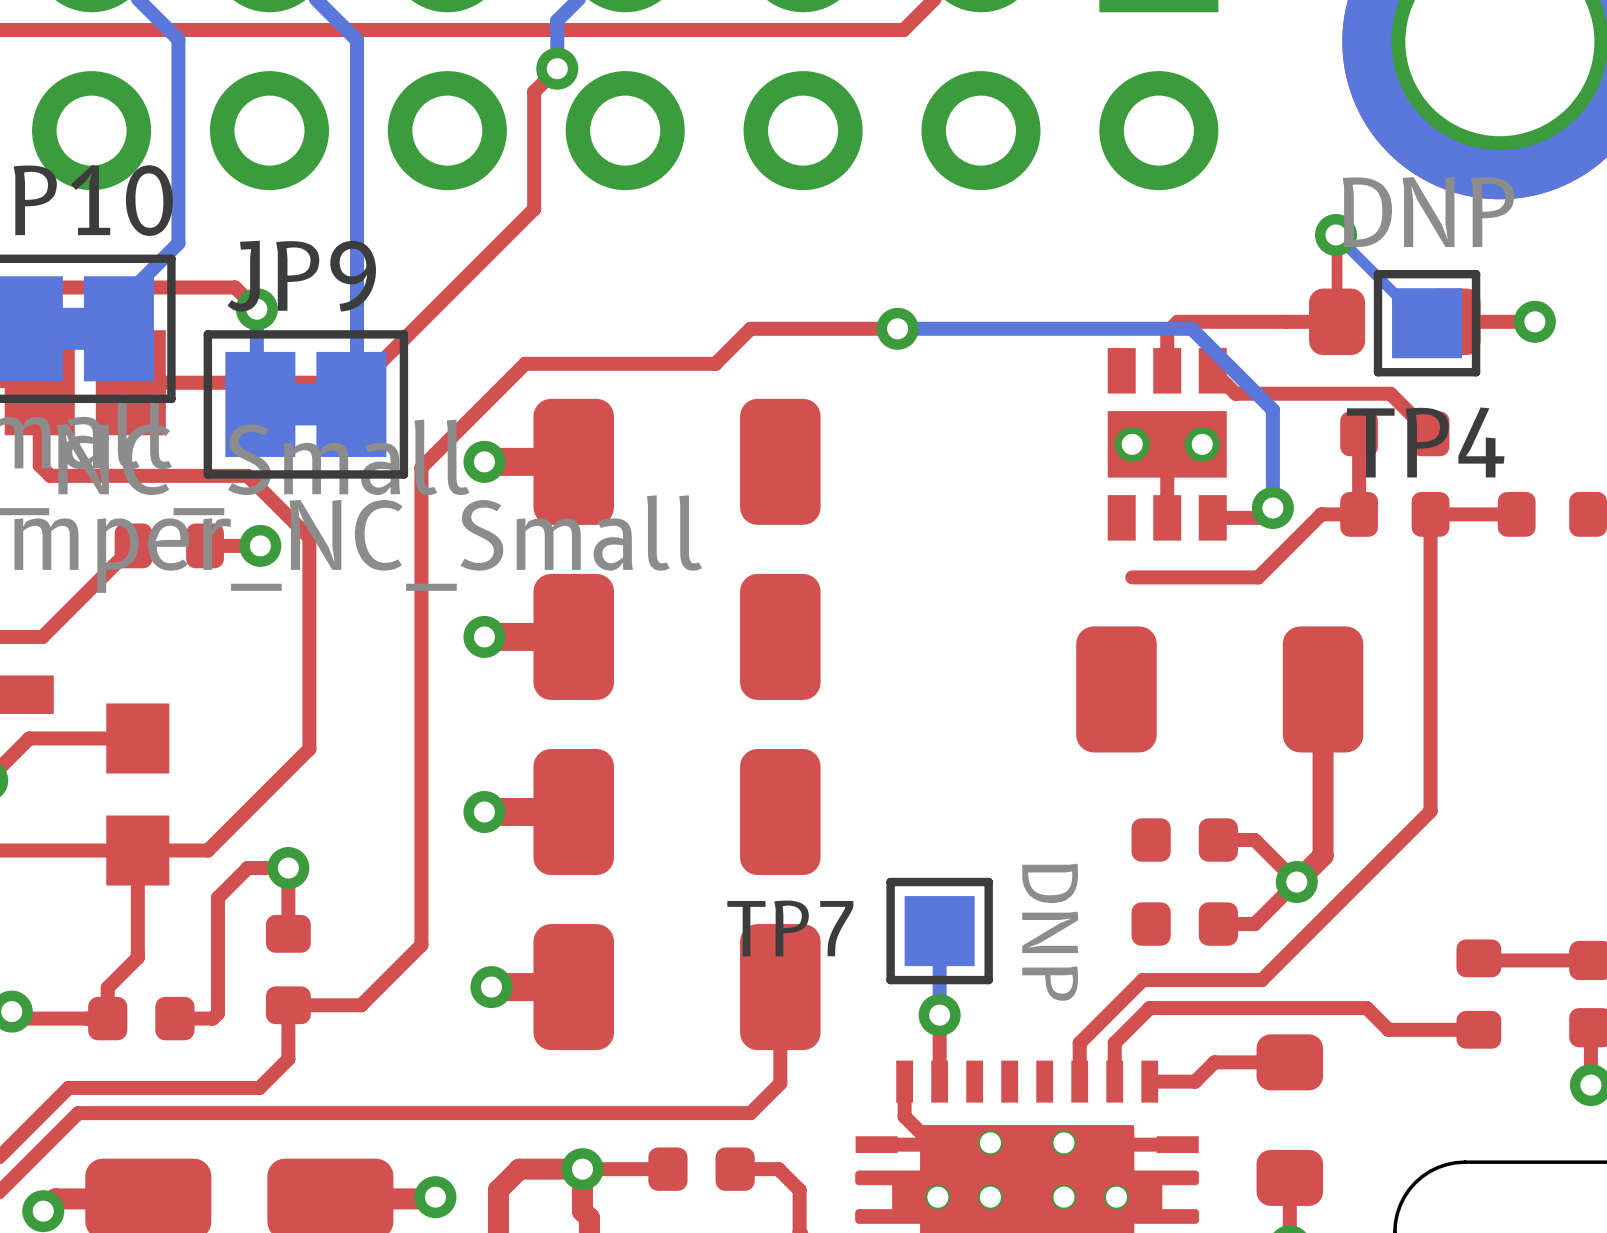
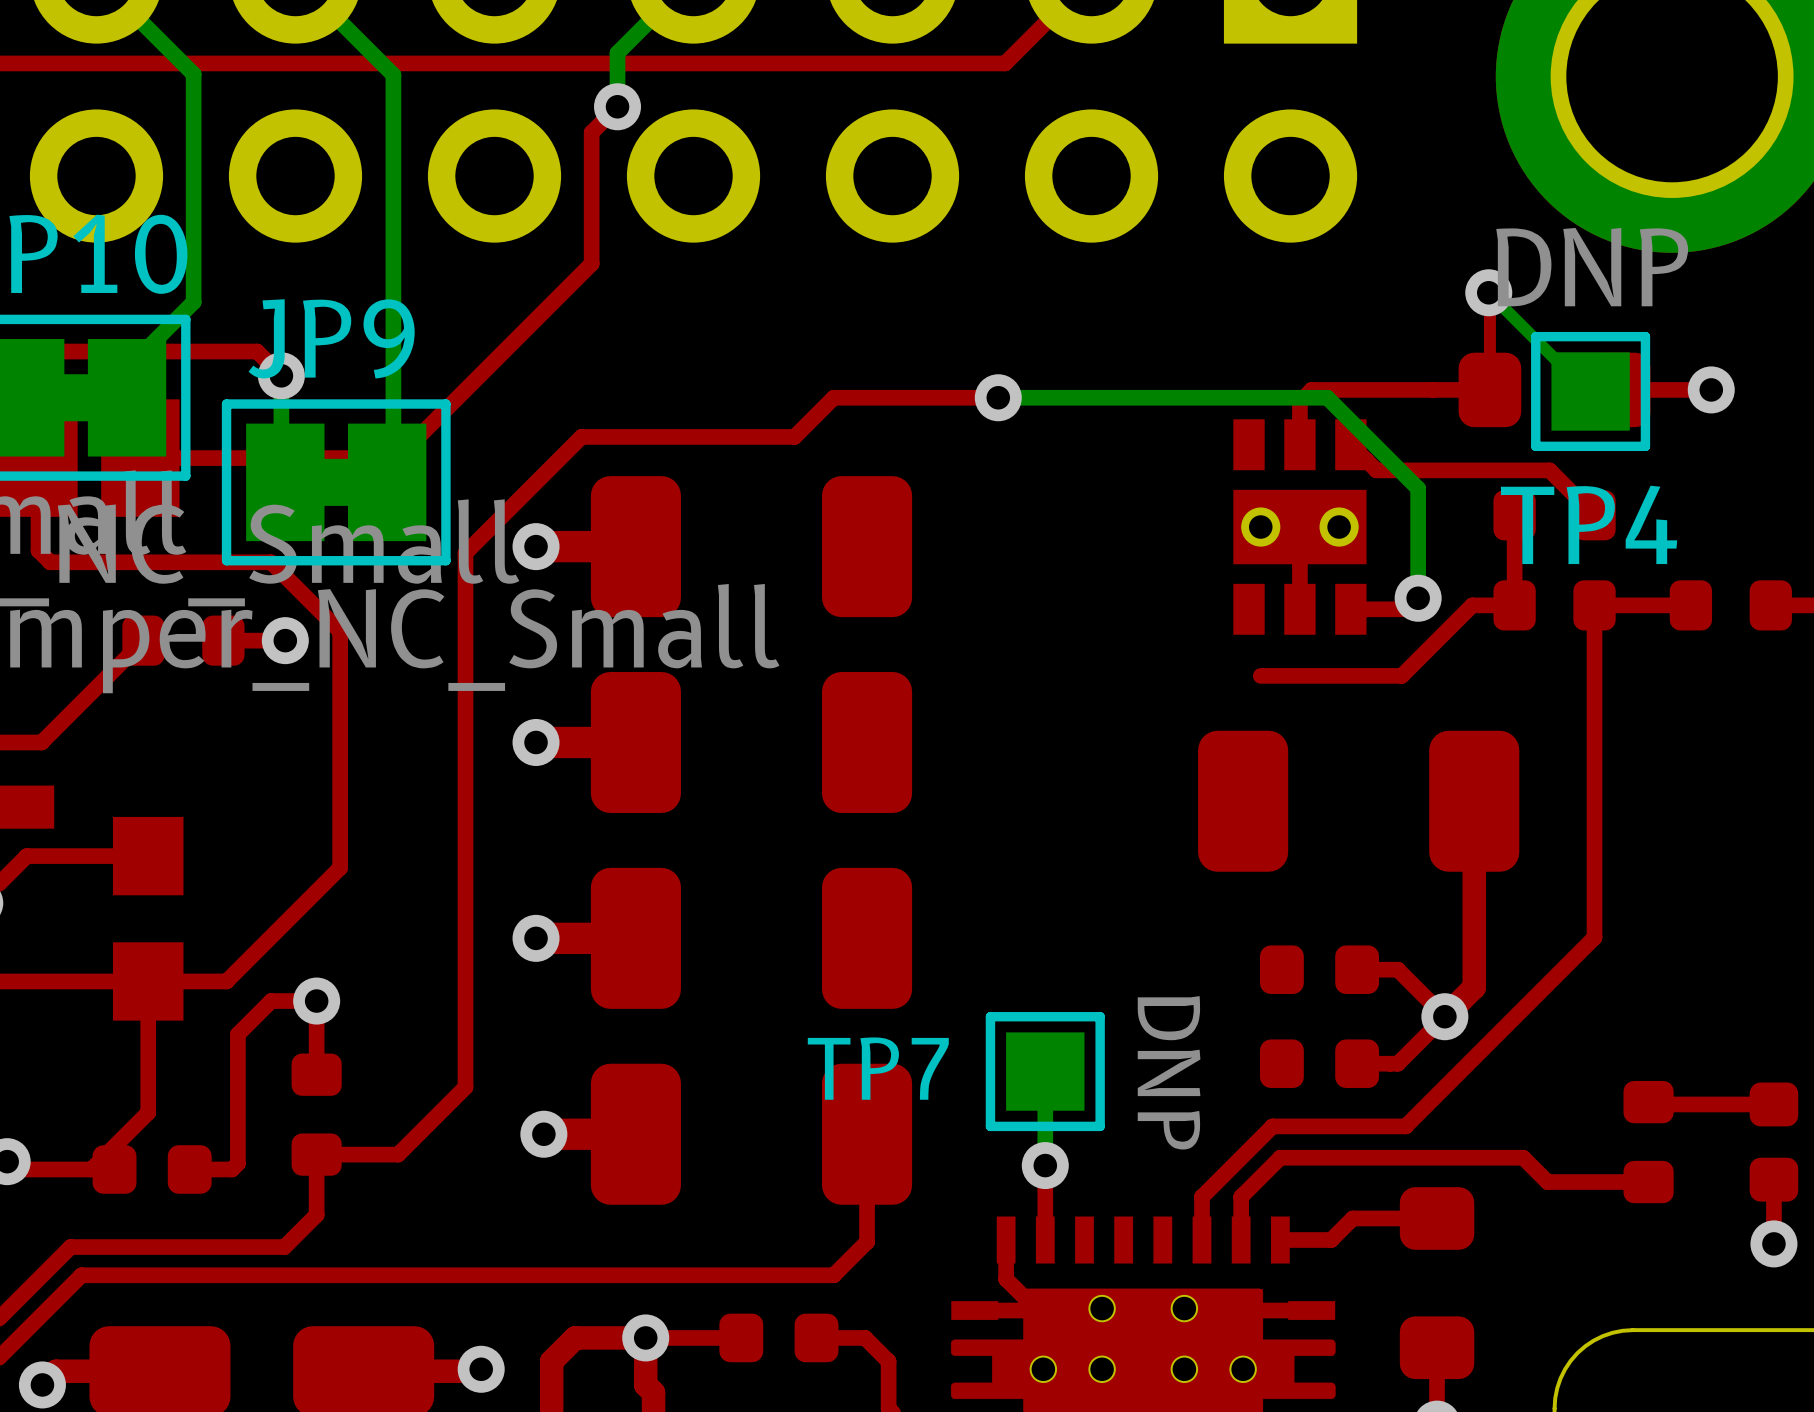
top track: (137, 957) (107, 987) (107, 1018) (87, 1018) -> (148, 1101) (148, 1112) (91, 1169)

